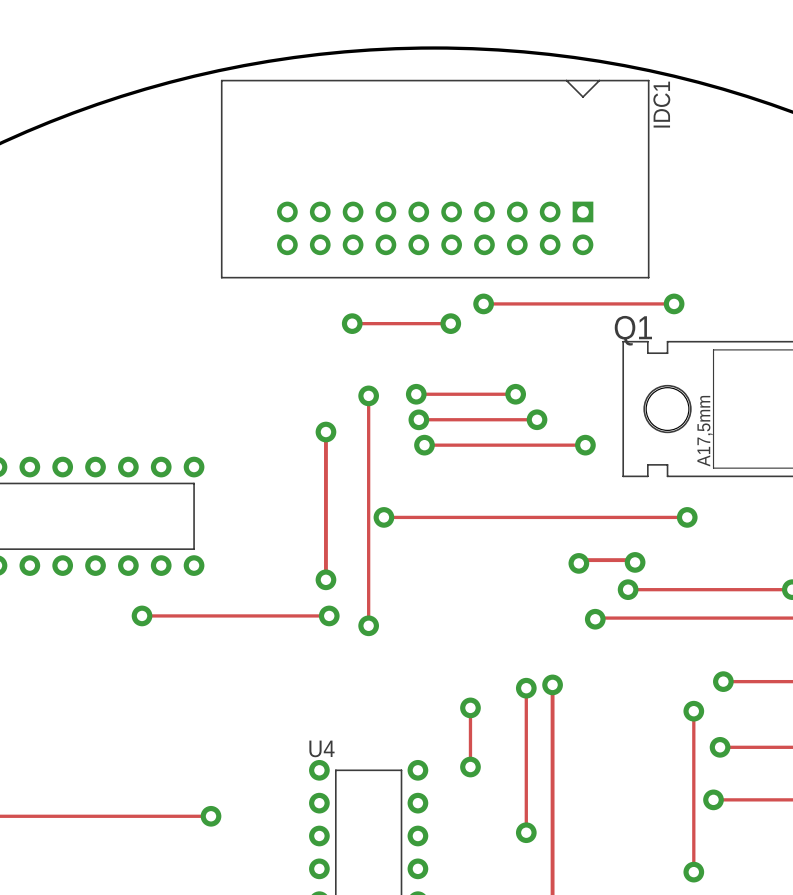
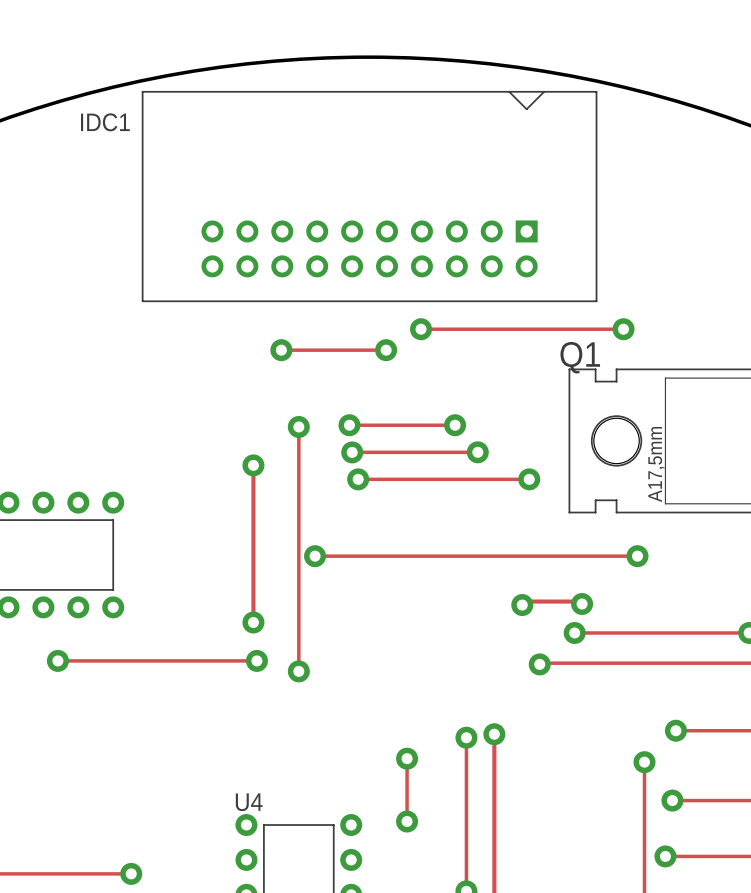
IDC1 name rotation: 0° (661, 104) -> 90° clockwise (105, 122)
IDC1 name position: IDC1 (661, 104) -> IDC1 (105, 122)

